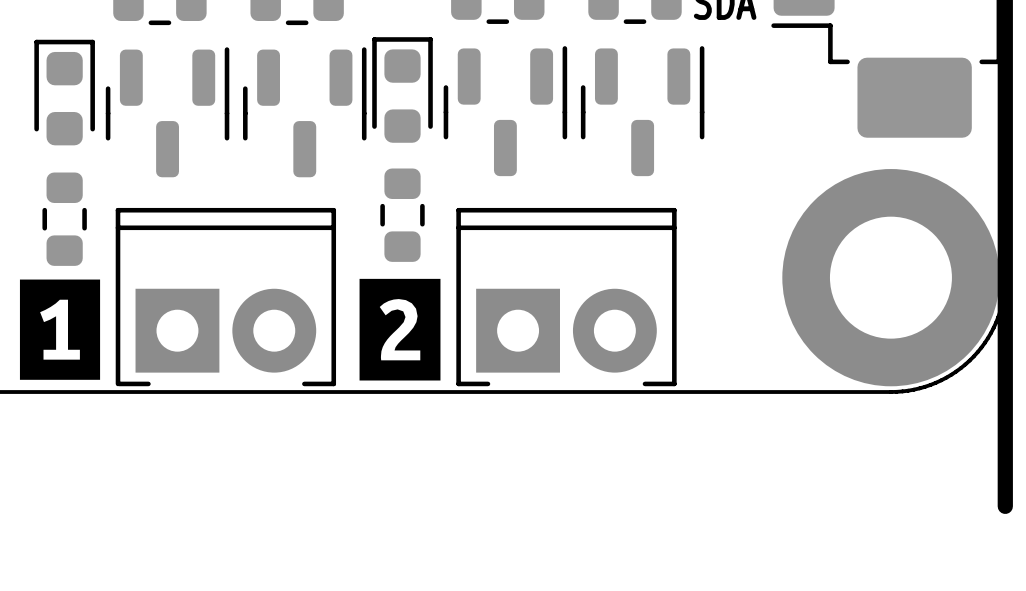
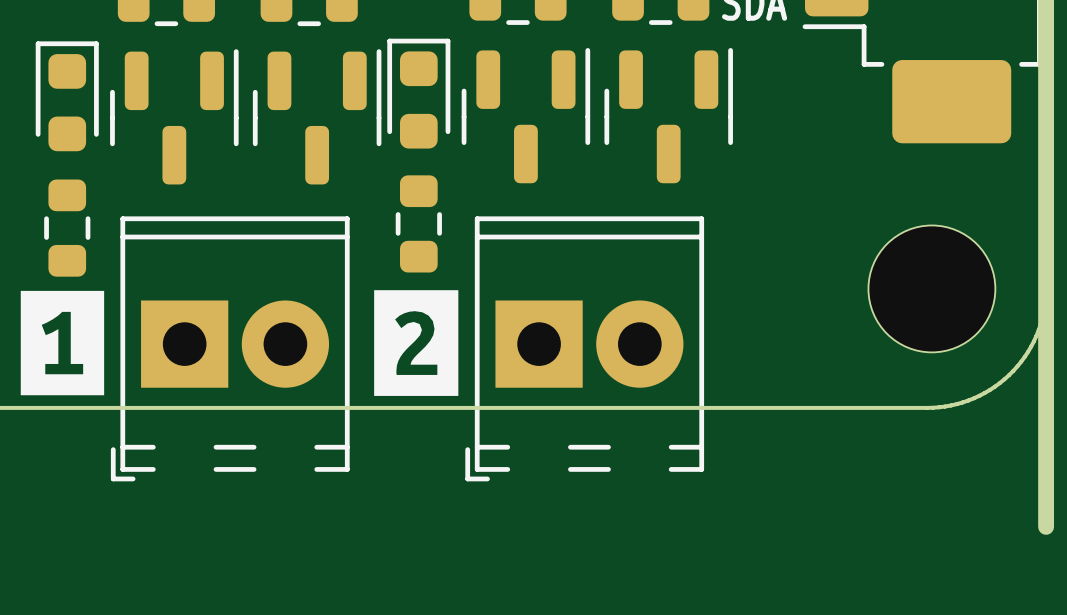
part footprint: [782, 169, 1000, 387] -> [868, 225, 996, 353]
part: (225, 297) -> none
part: (566, 297) -> none
part: none -> (230, 348)
part: none -> (584, 348)

